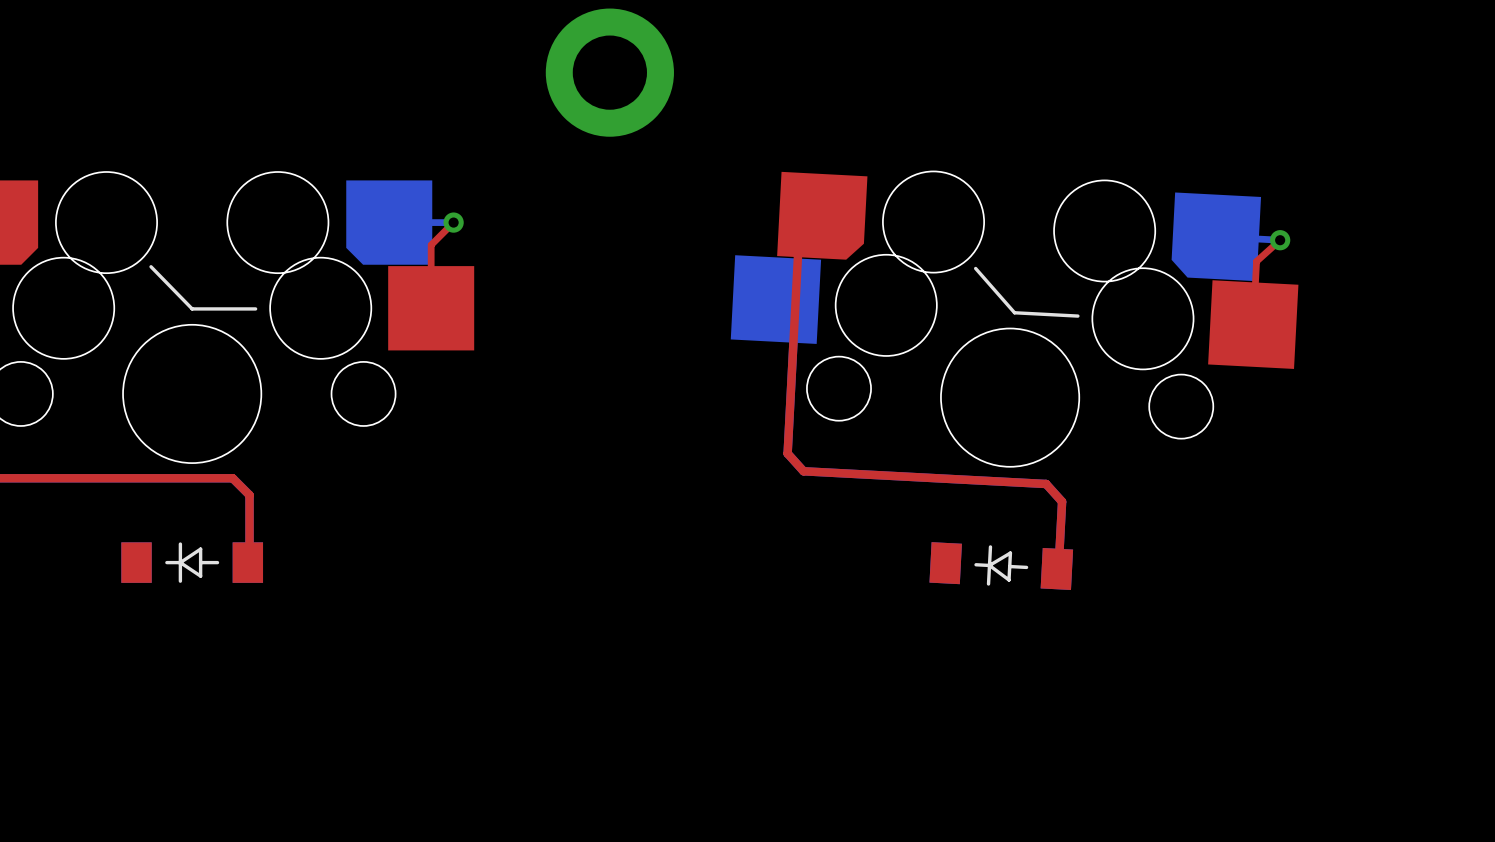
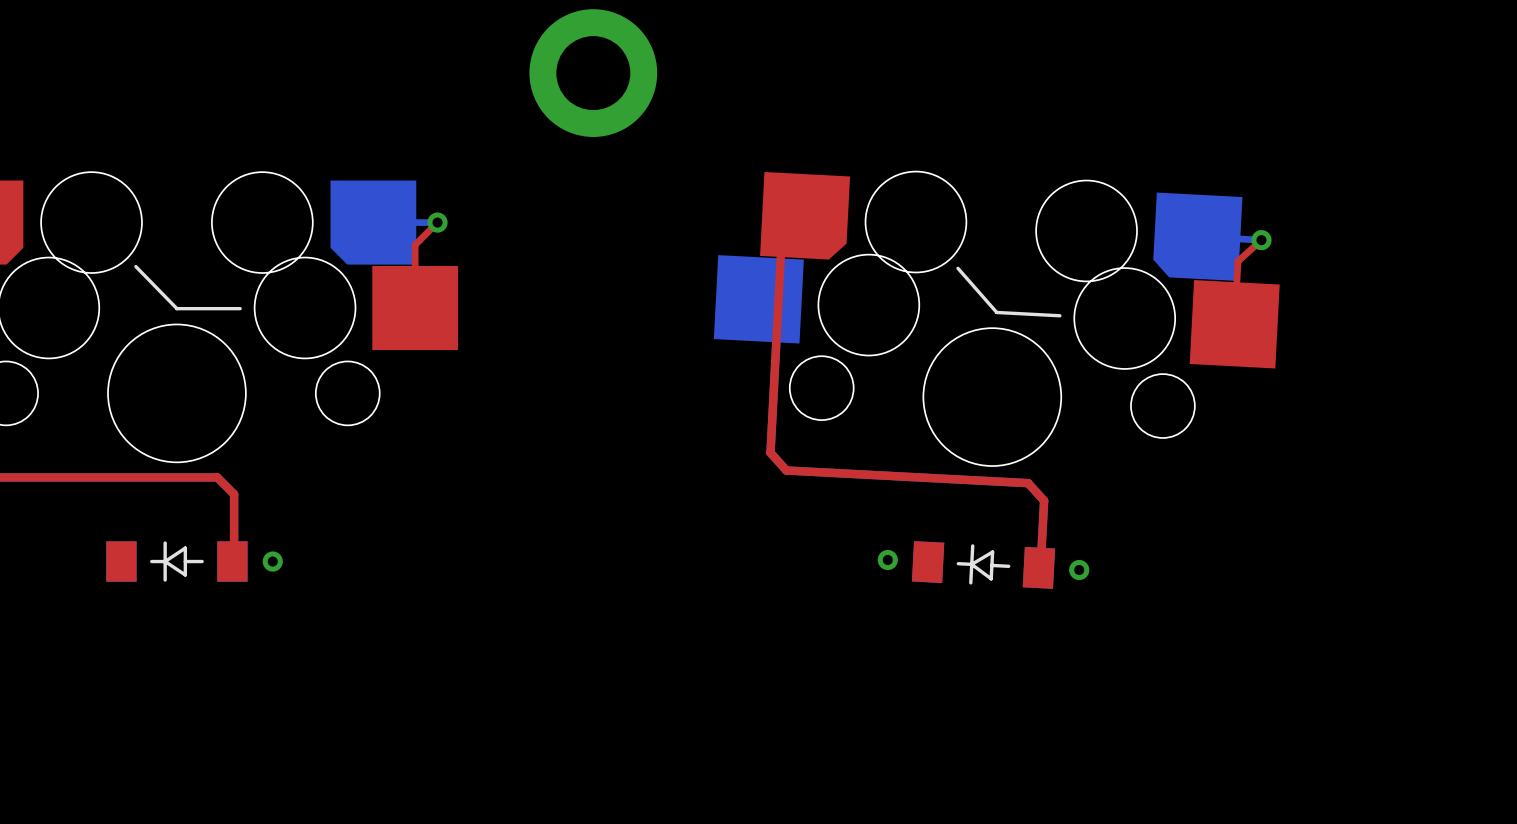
via: none -> (887, 559)
via: none -> (272, 561)
via: none -> (1079, 570)

